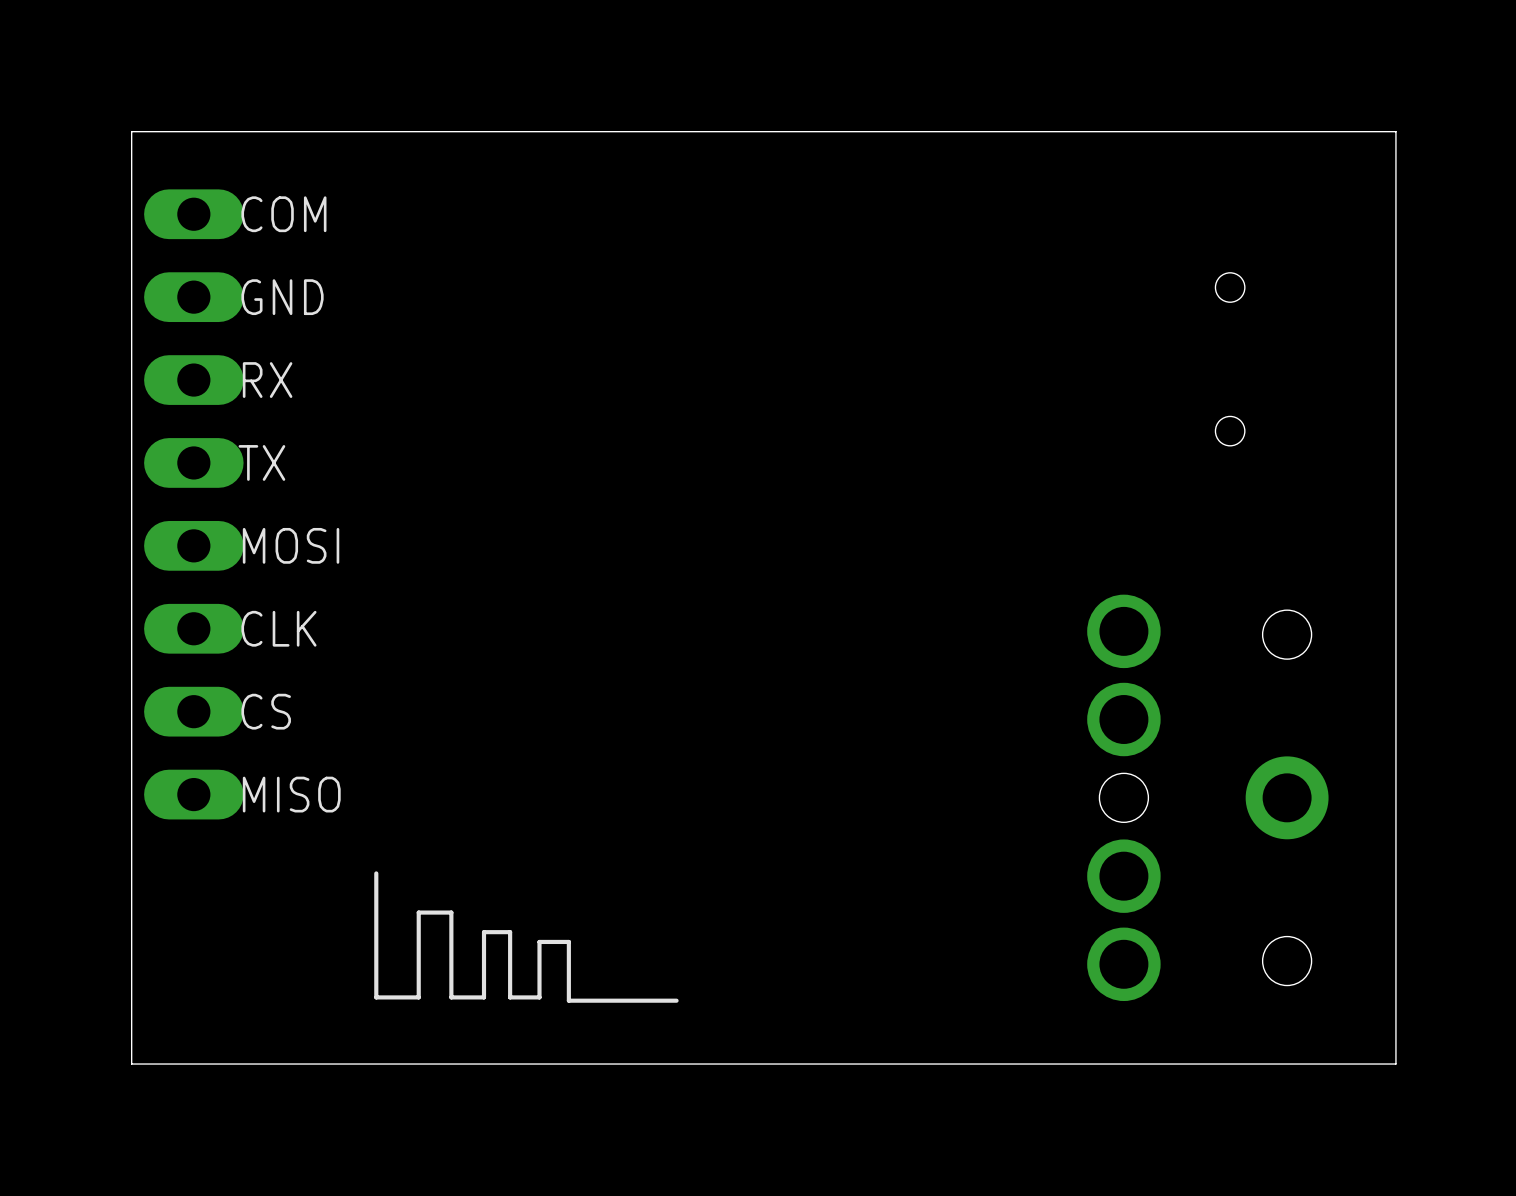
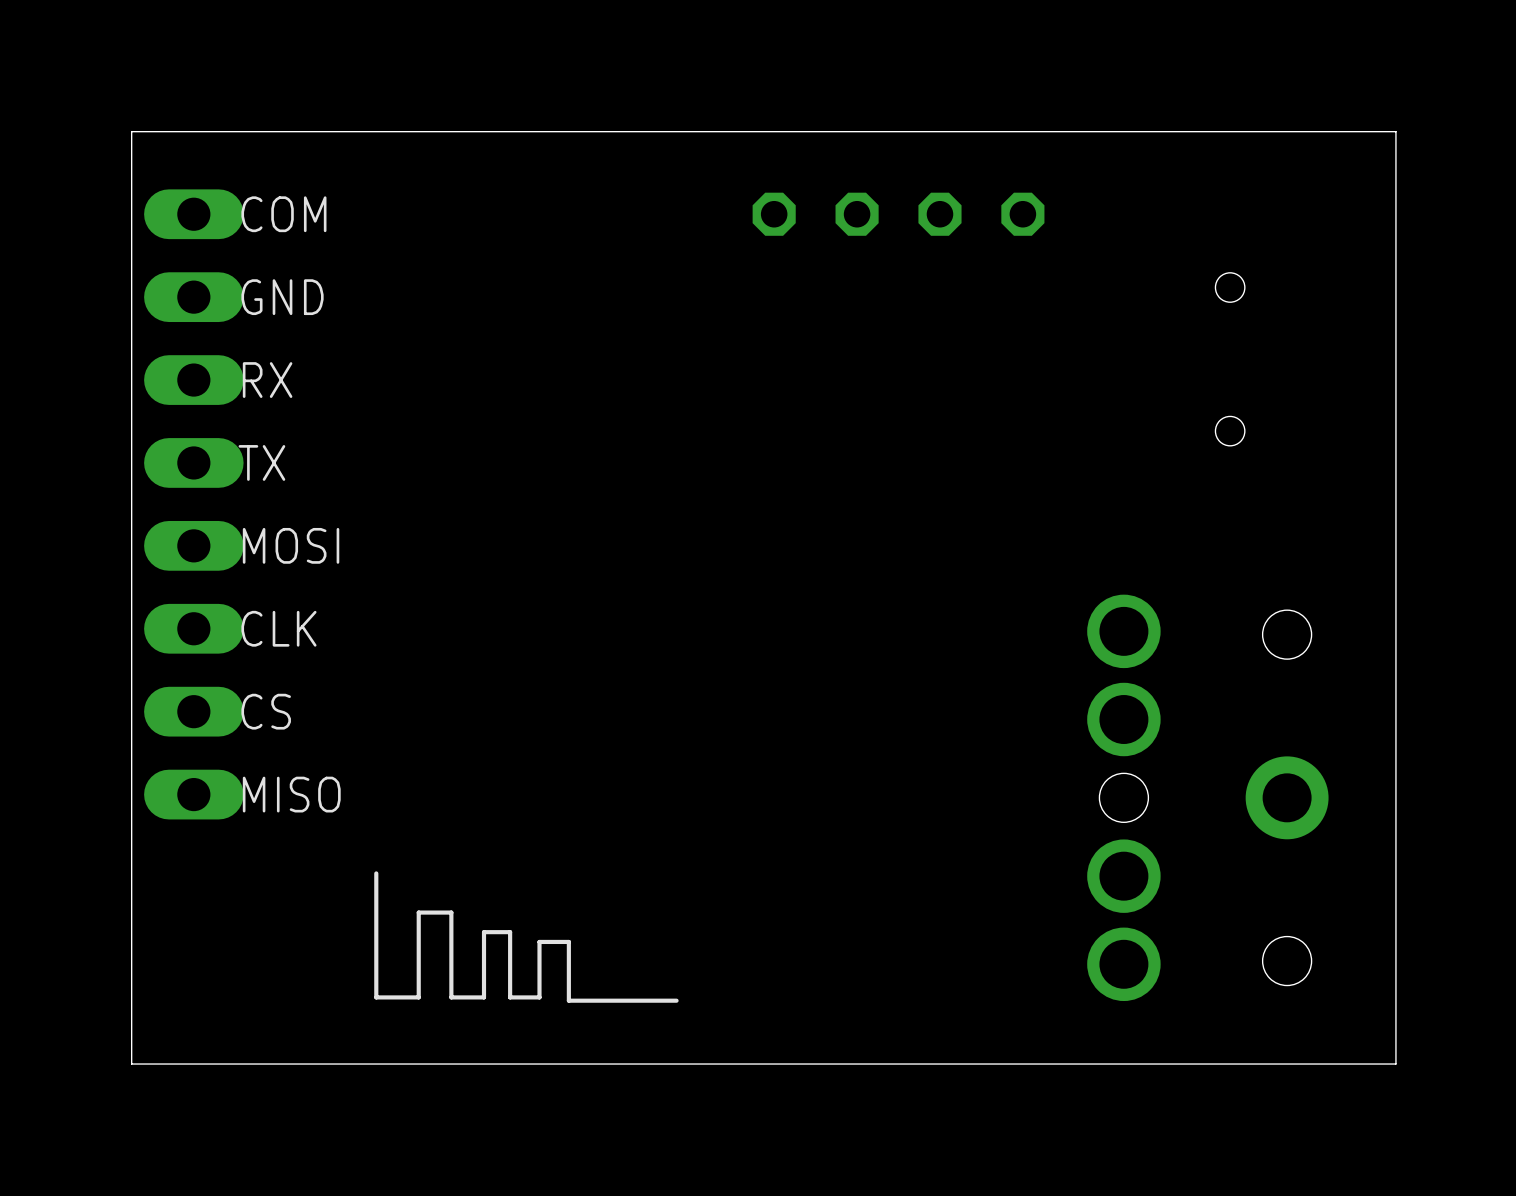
part: none -> (815, 214)
part: none -> (981, 214)

